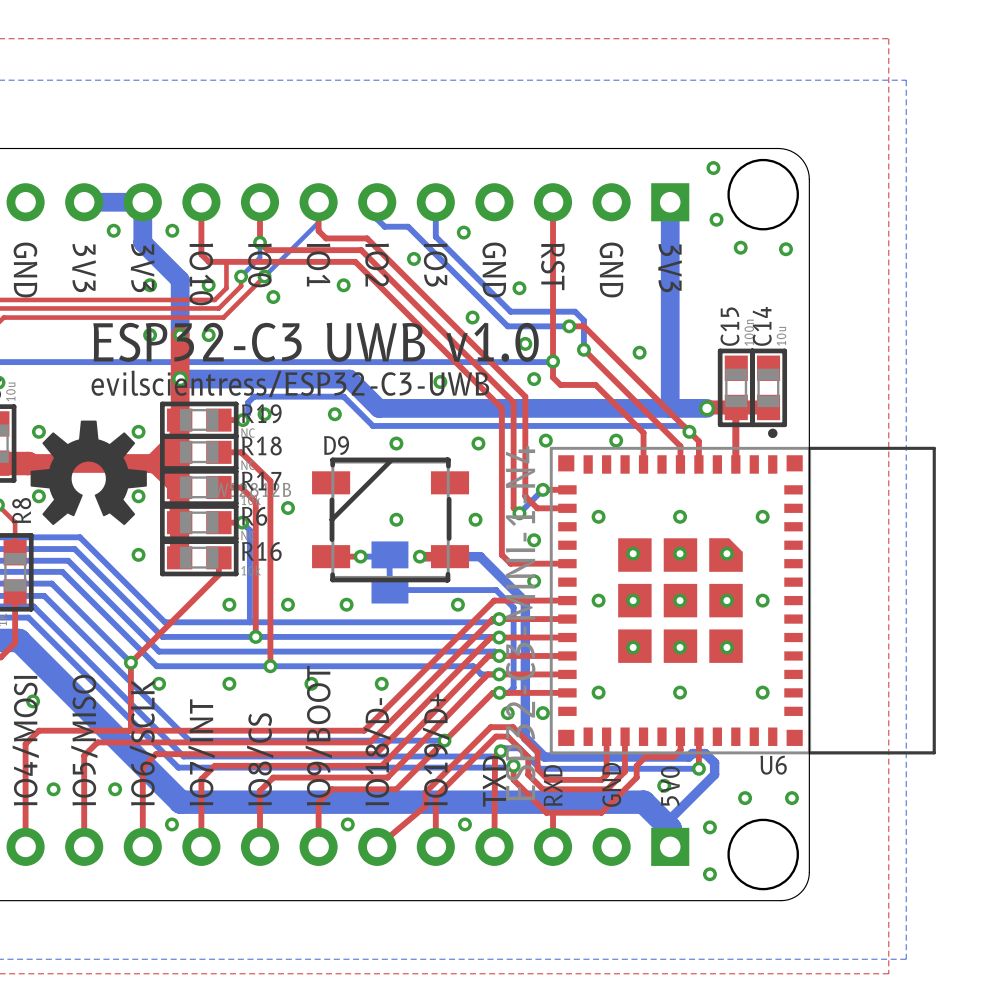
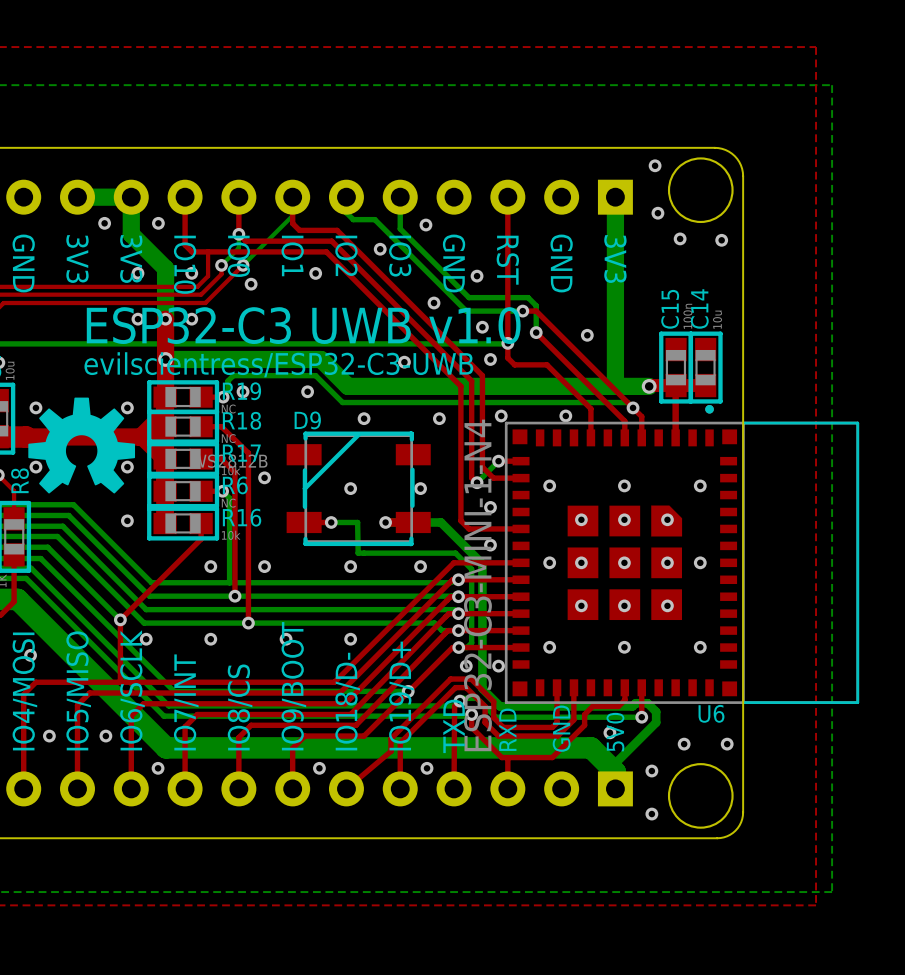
via position: (396, 519) -> (350, 488)
via position: (475, 519) -> (420, 488)
part: (389, 572) -> none
via position: (346, 604) -> (350, 566)

